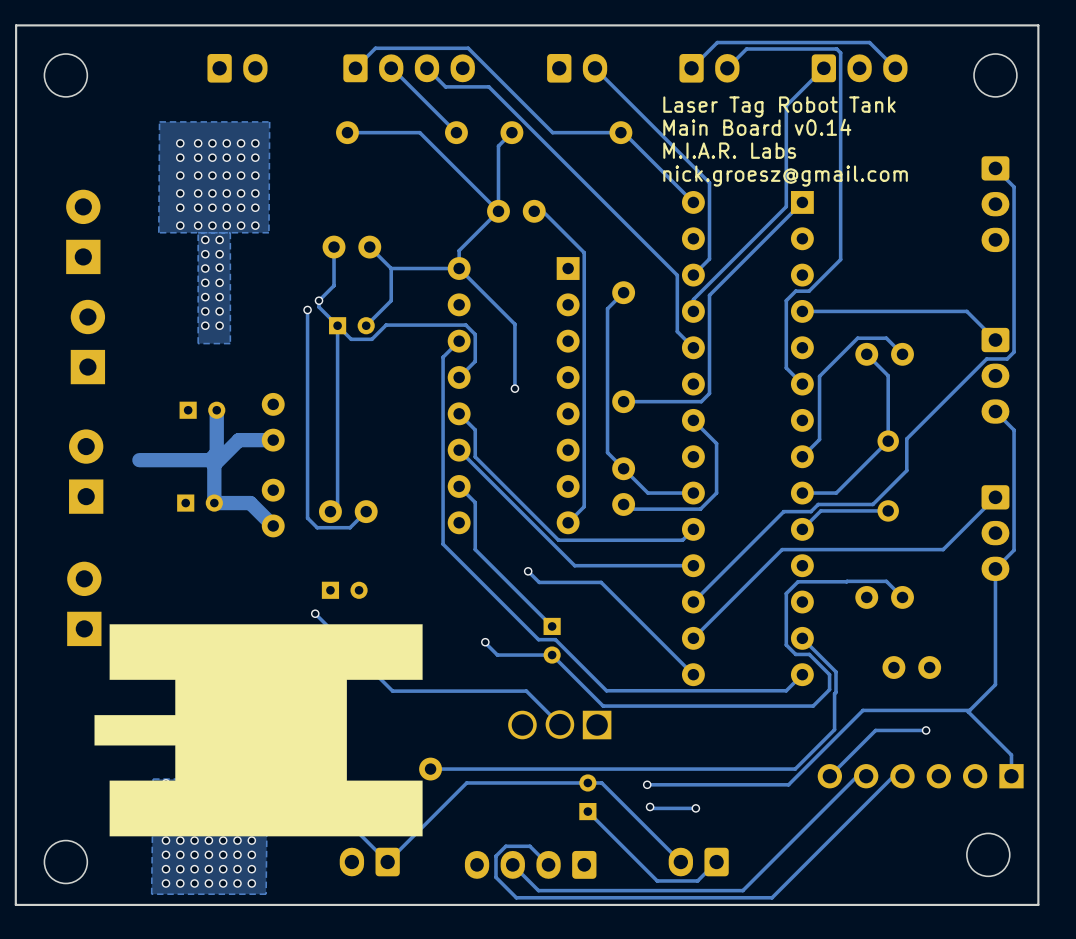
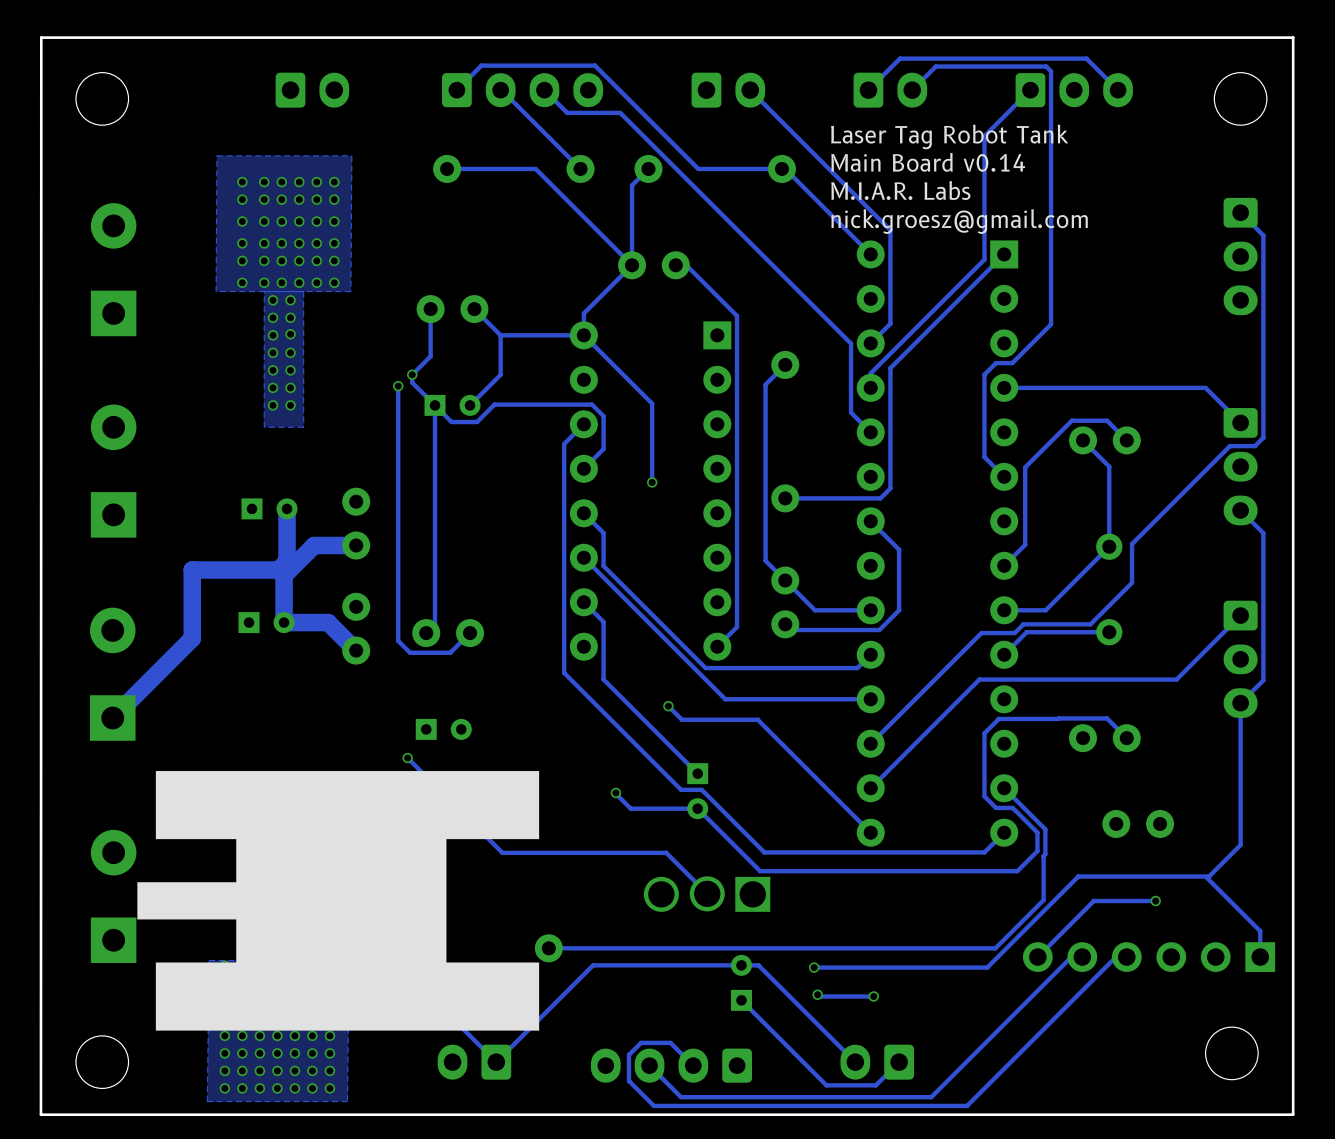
part: none -> (113, 269)
part: (83, 231) -> none
part: (87, 342) -> none
part: none -> (113, 471)
track: none -> (192, 570) (192, 638) (112, 718)
part: (86, 471) -> none
part: none -> (112, 674)
part: (84, 603) -> none
part: none -> (113, 896)

